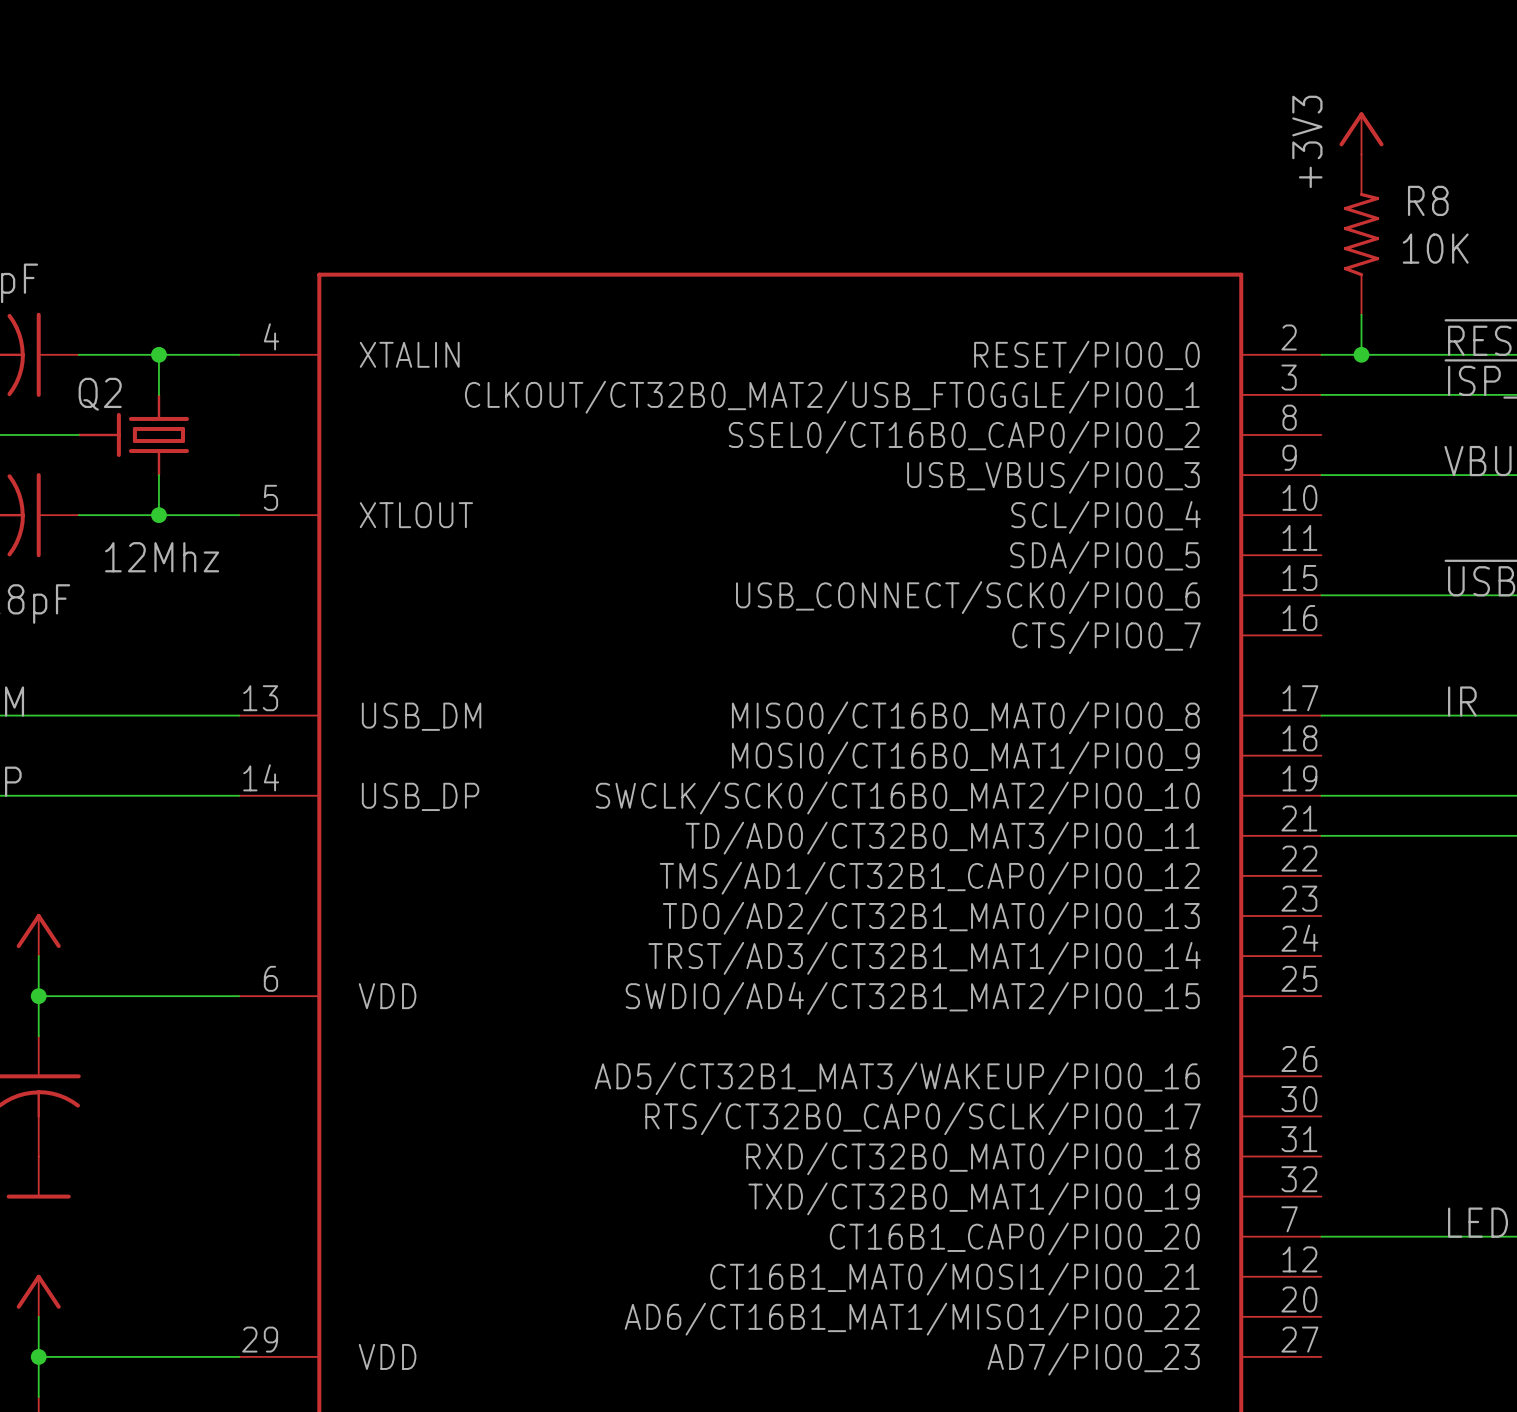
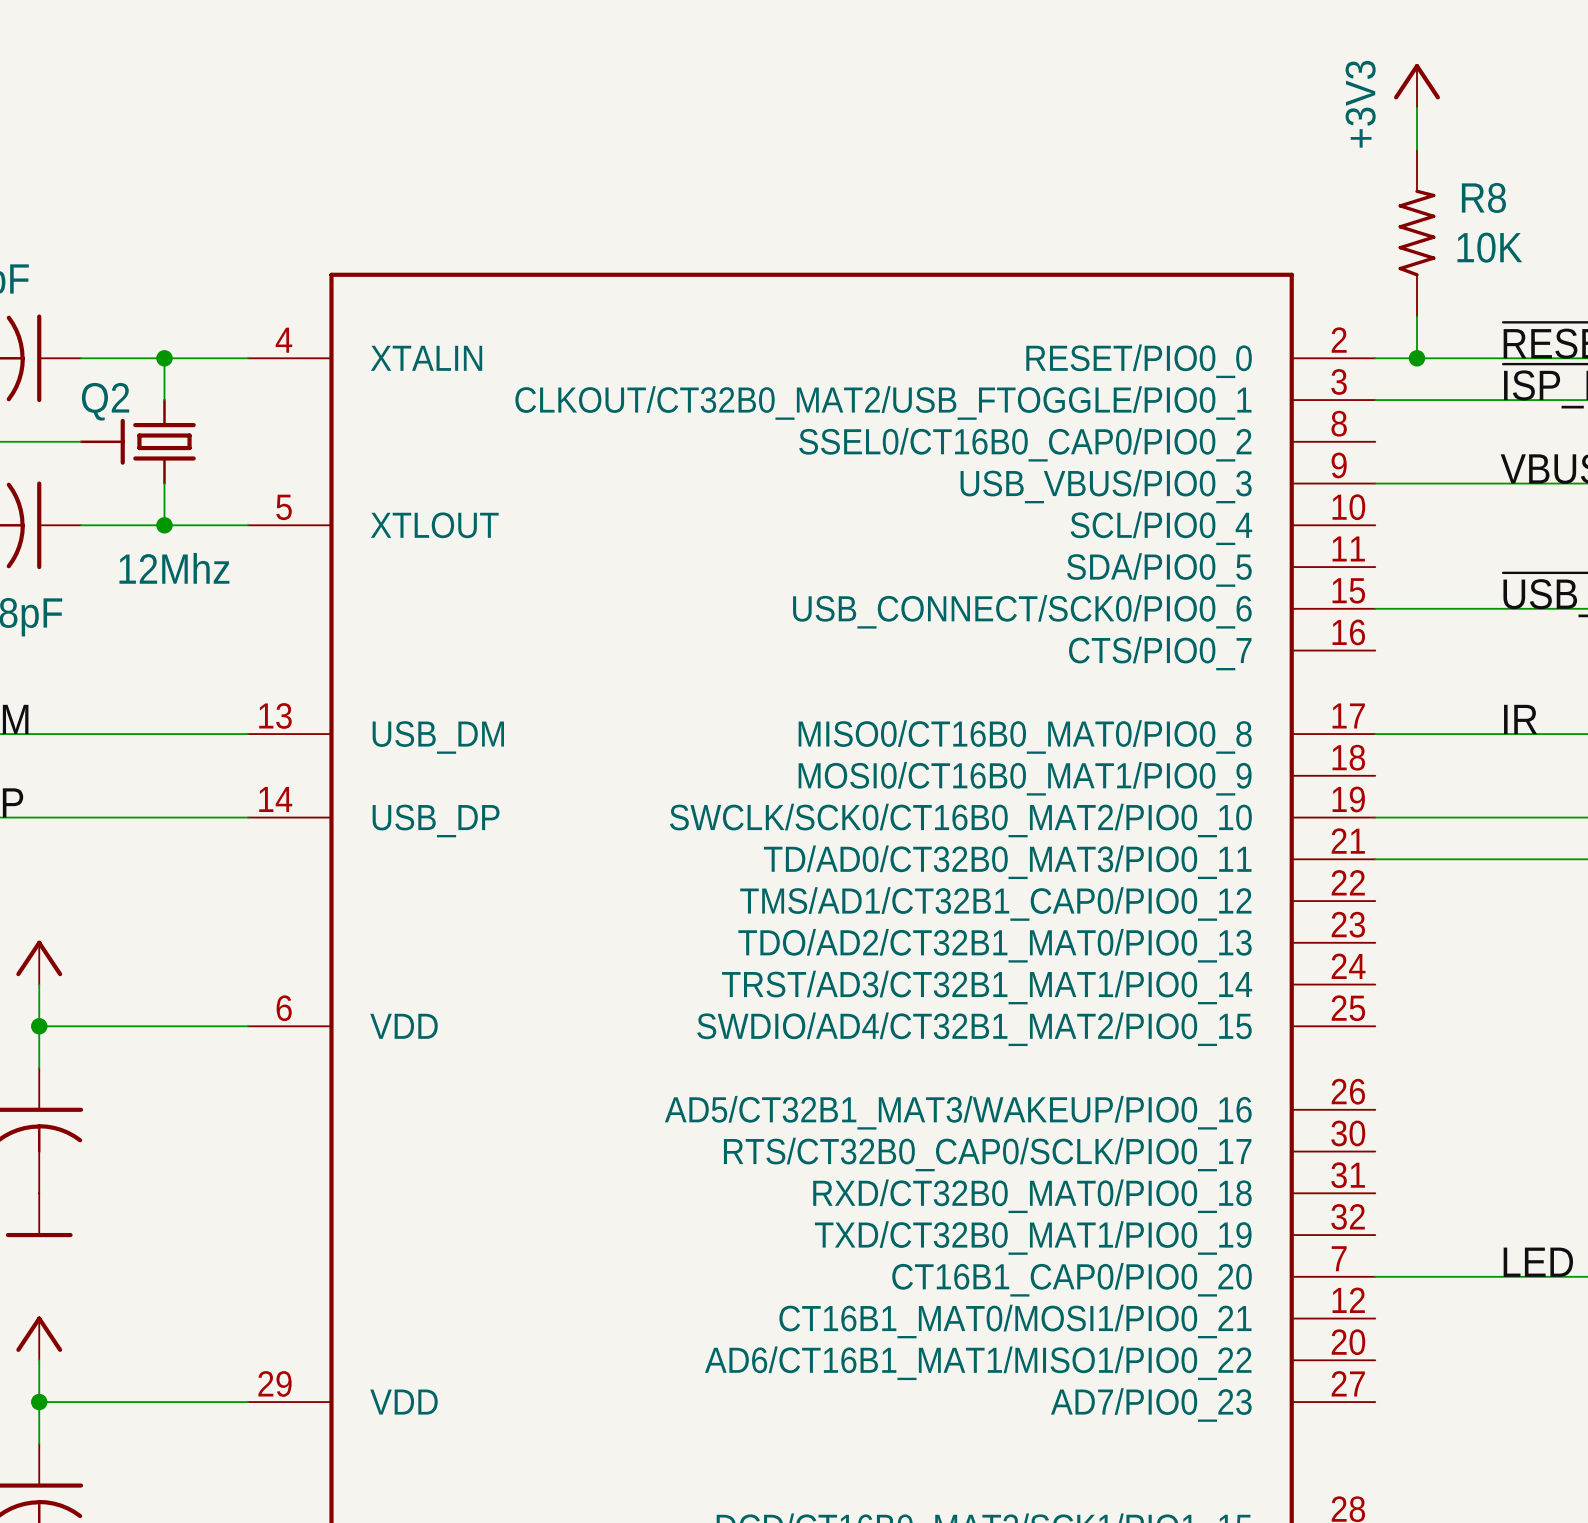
power symbol position: +3V3 (1361, 133) -> +3V3 (1416, 85)

